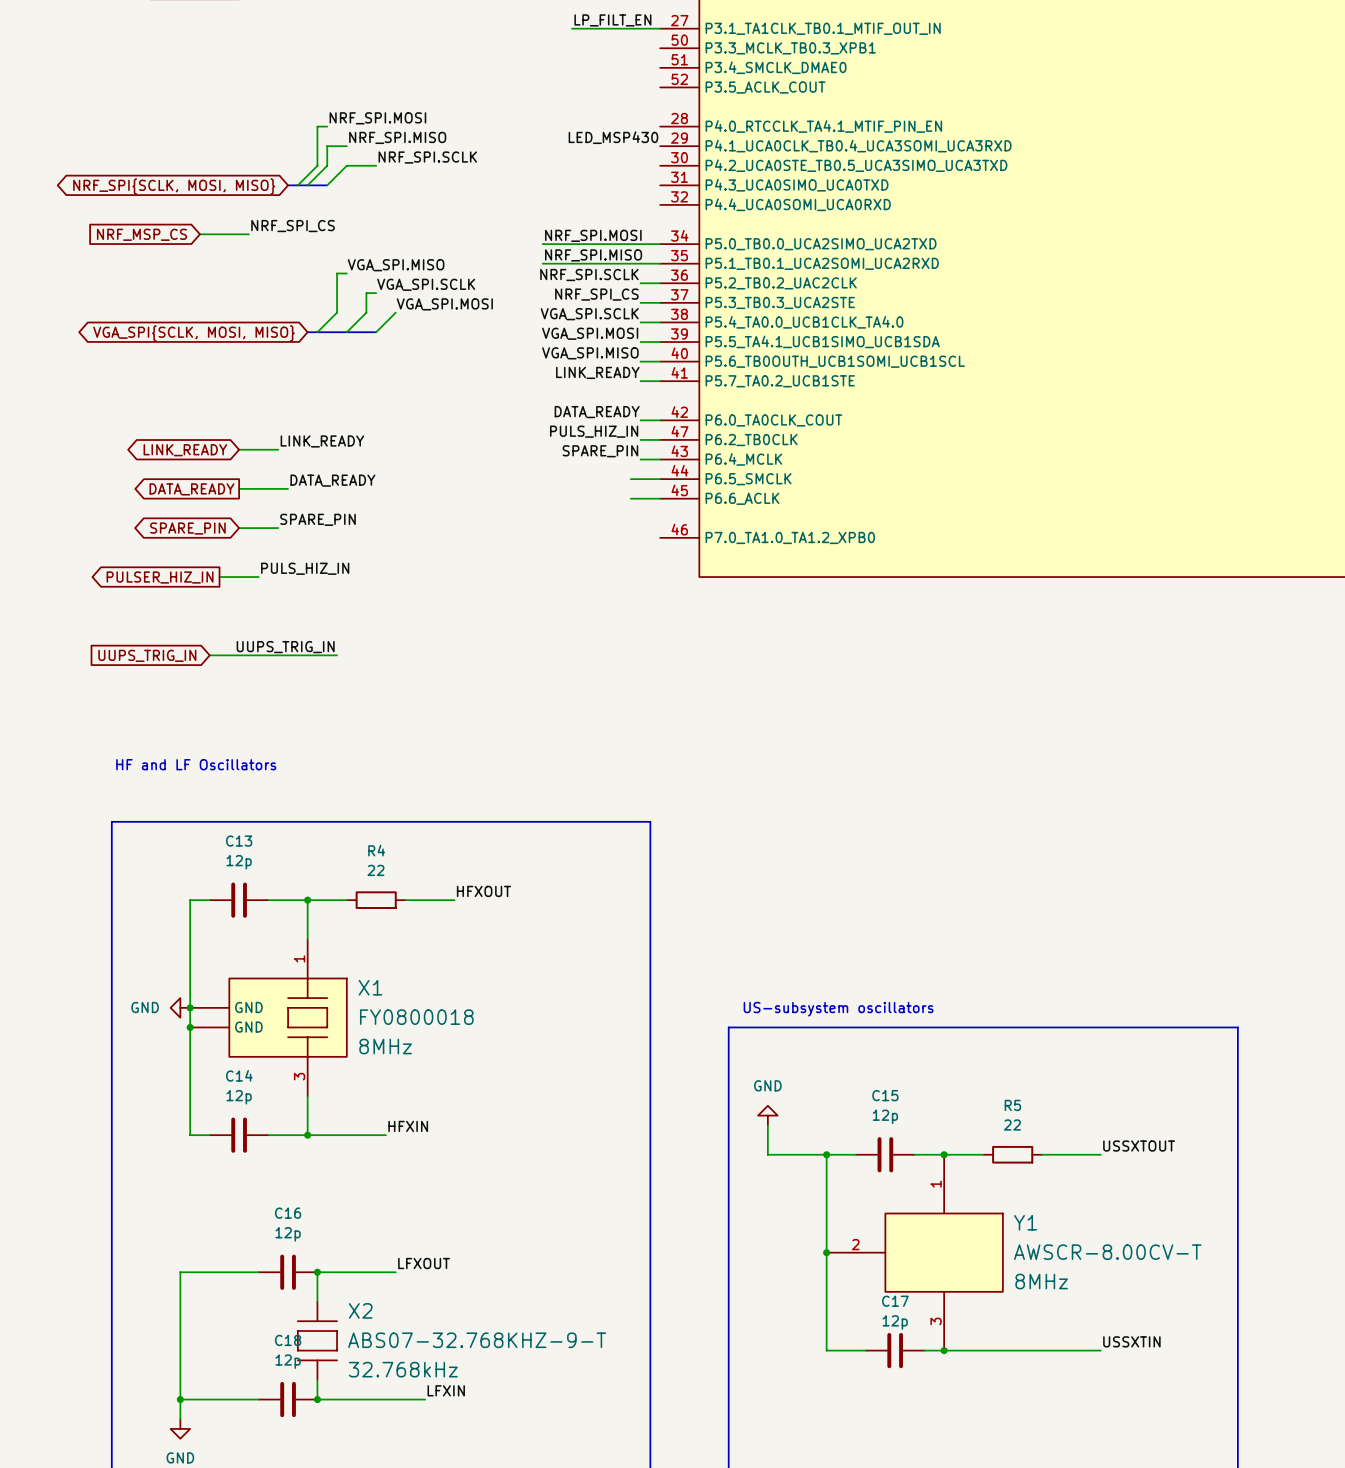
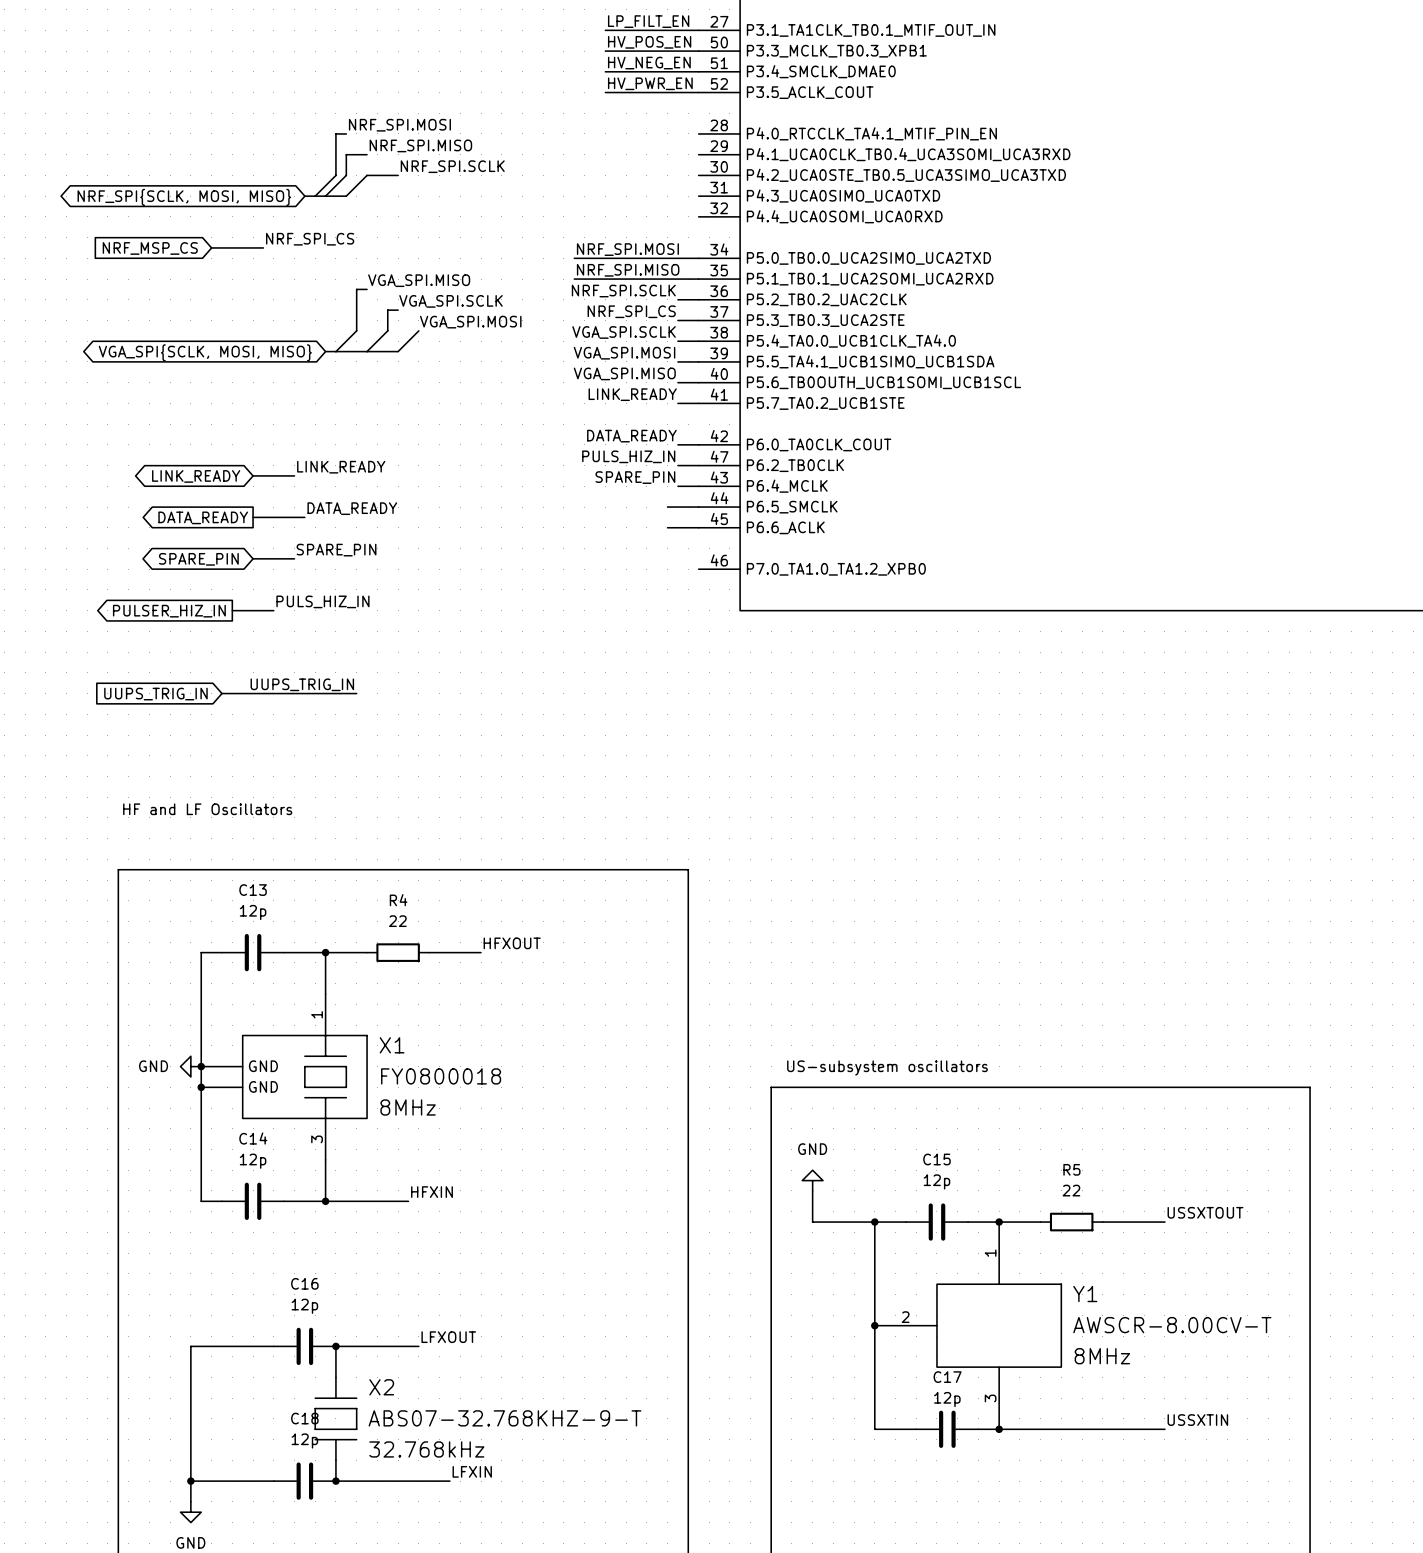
label: none -> HV_POS_EN (649, 42)
wire: none -> (605, 51) (698, 51)
label: none -> HV_NEG_EN (649, 63)
wire: none -> (605, 71) (698, 71)
label: none -> HV_PWR_EN (650, 83)
wire: none -> (605, 92) (698, 92)
label: LED_MSP430 (613, 137) -> none

